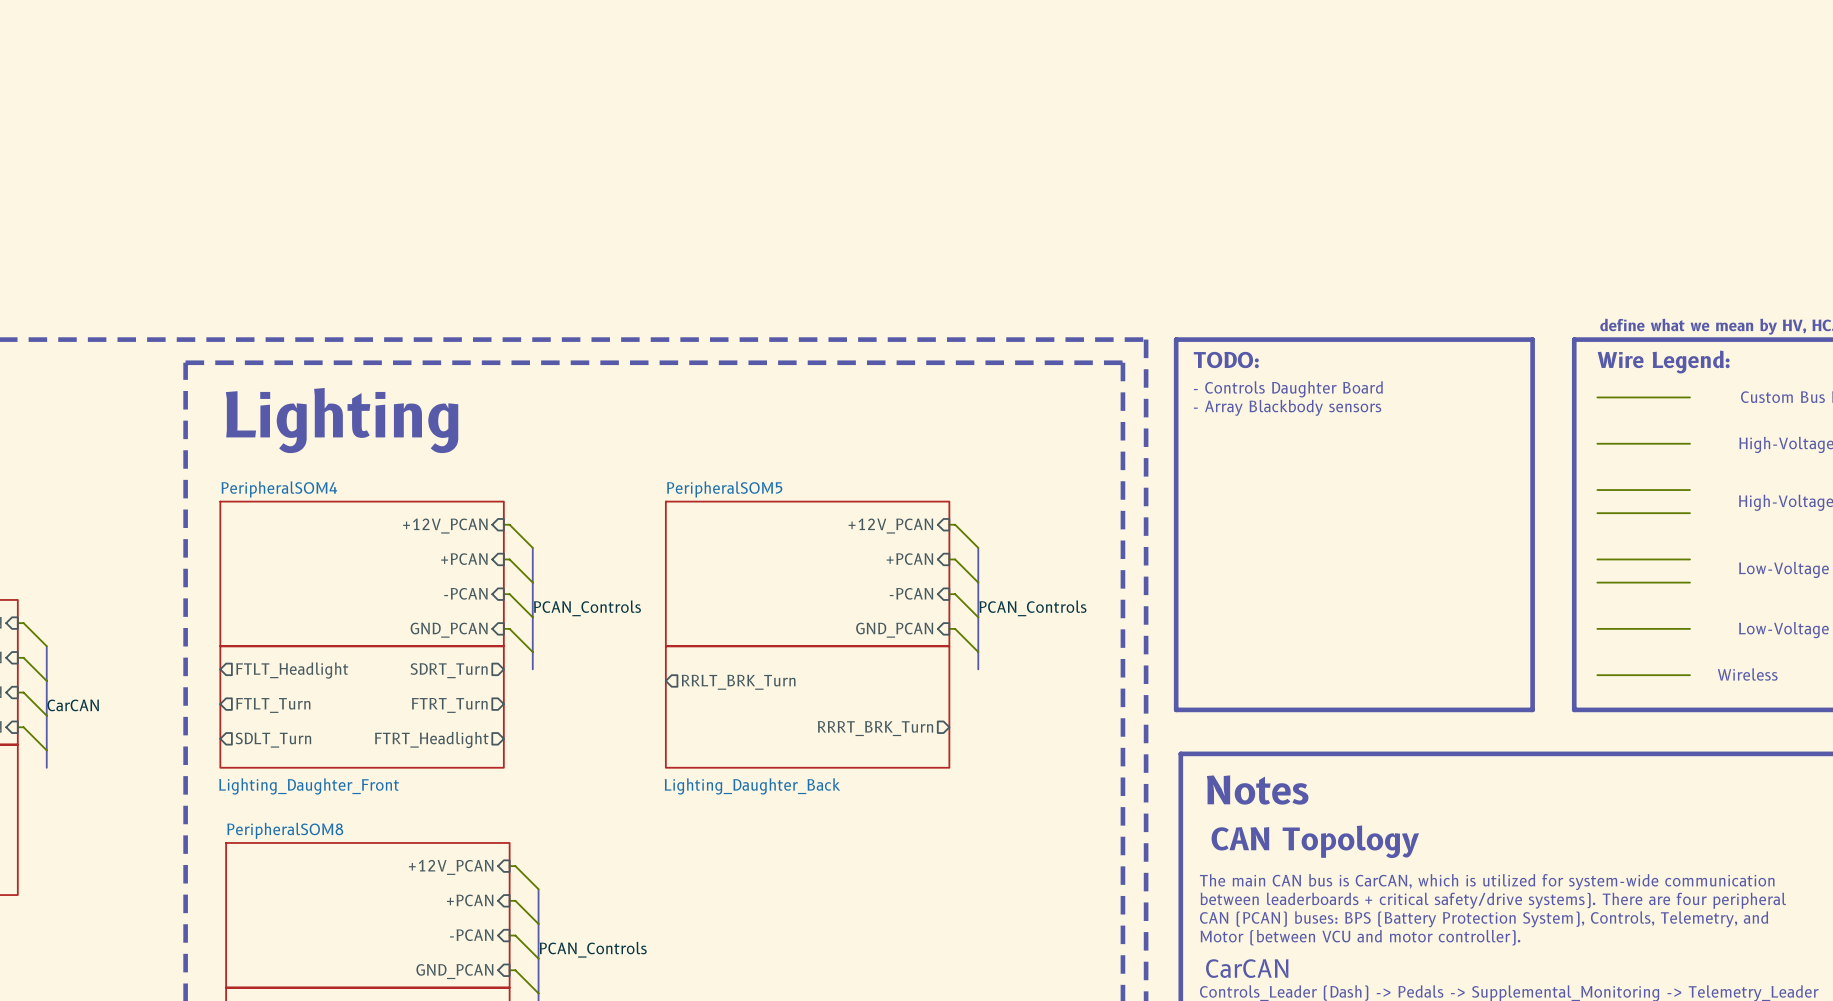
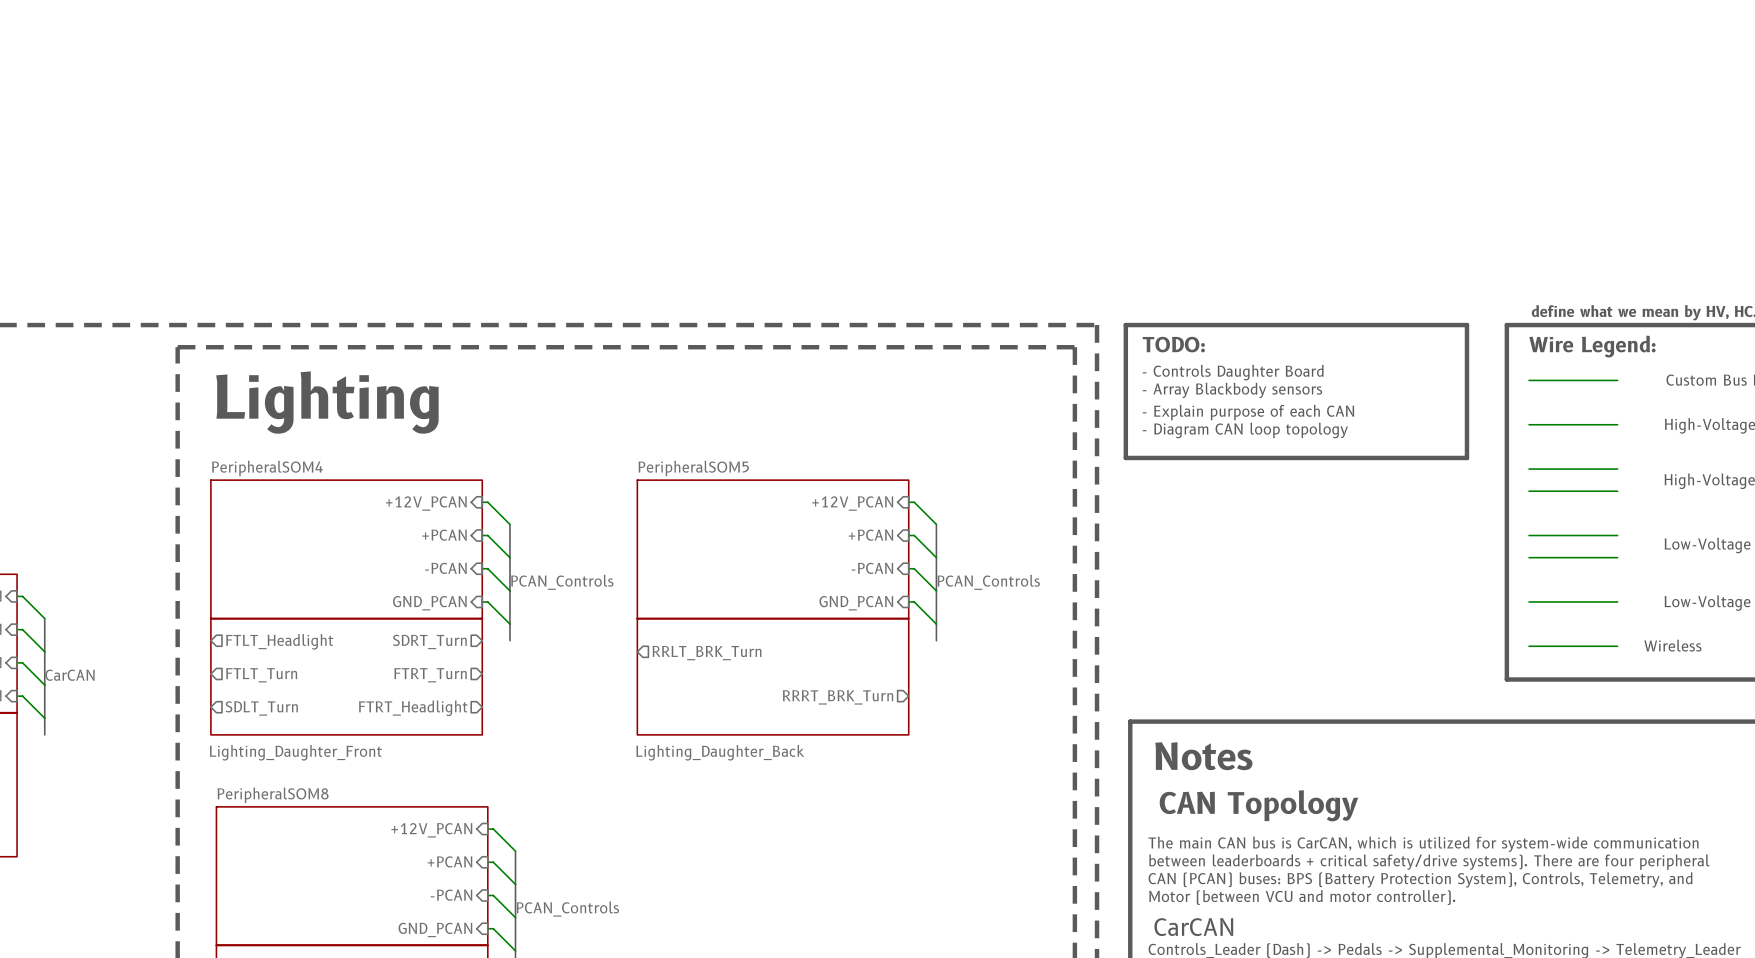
text: none -> - Explain purpose of each CAN (1248, 412)
text: none -> - Diagram CAN loop topology (1245, 430)
line: (1176, 478) (1176, 709) (1532, 709) (1532, 478) -> (1125, 457) (1466, 457)

